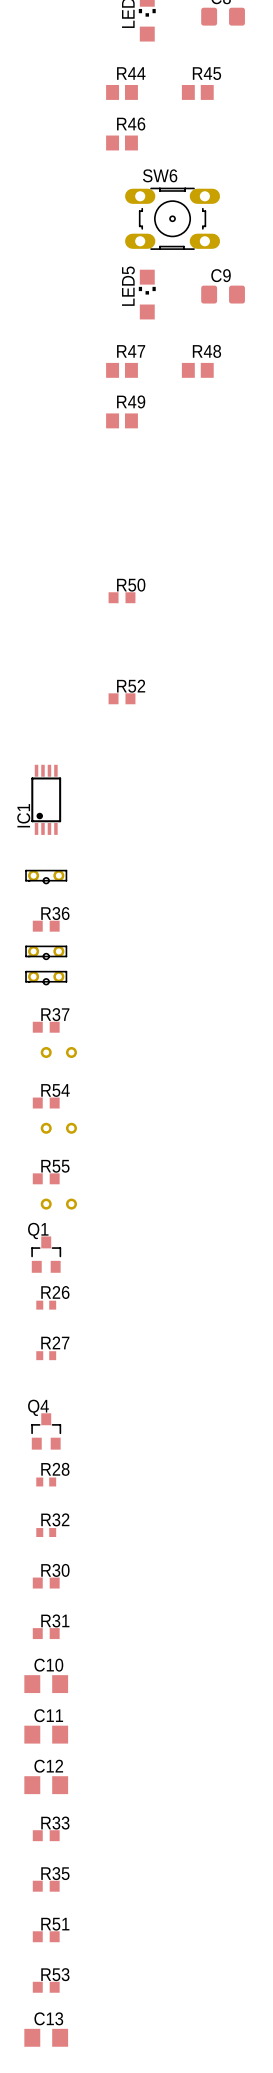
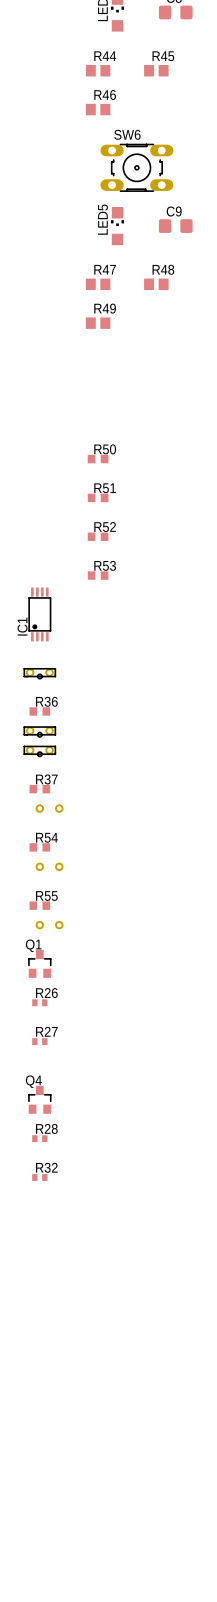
R30: (46, 1583) -> none
R31: (46, 1633) -> none
C10: (46, 1684) -> none
C11: (46, 1734) -> none
C12: (46, 1785) -> none
R33: (46, 1835) -> none
R35: (46, 1886) -> none
R51 position: (46, 1936) -> (98, 497)
R53 position: (46, 1987) -> (98, 575)
C13: (46, 2037) -> none

